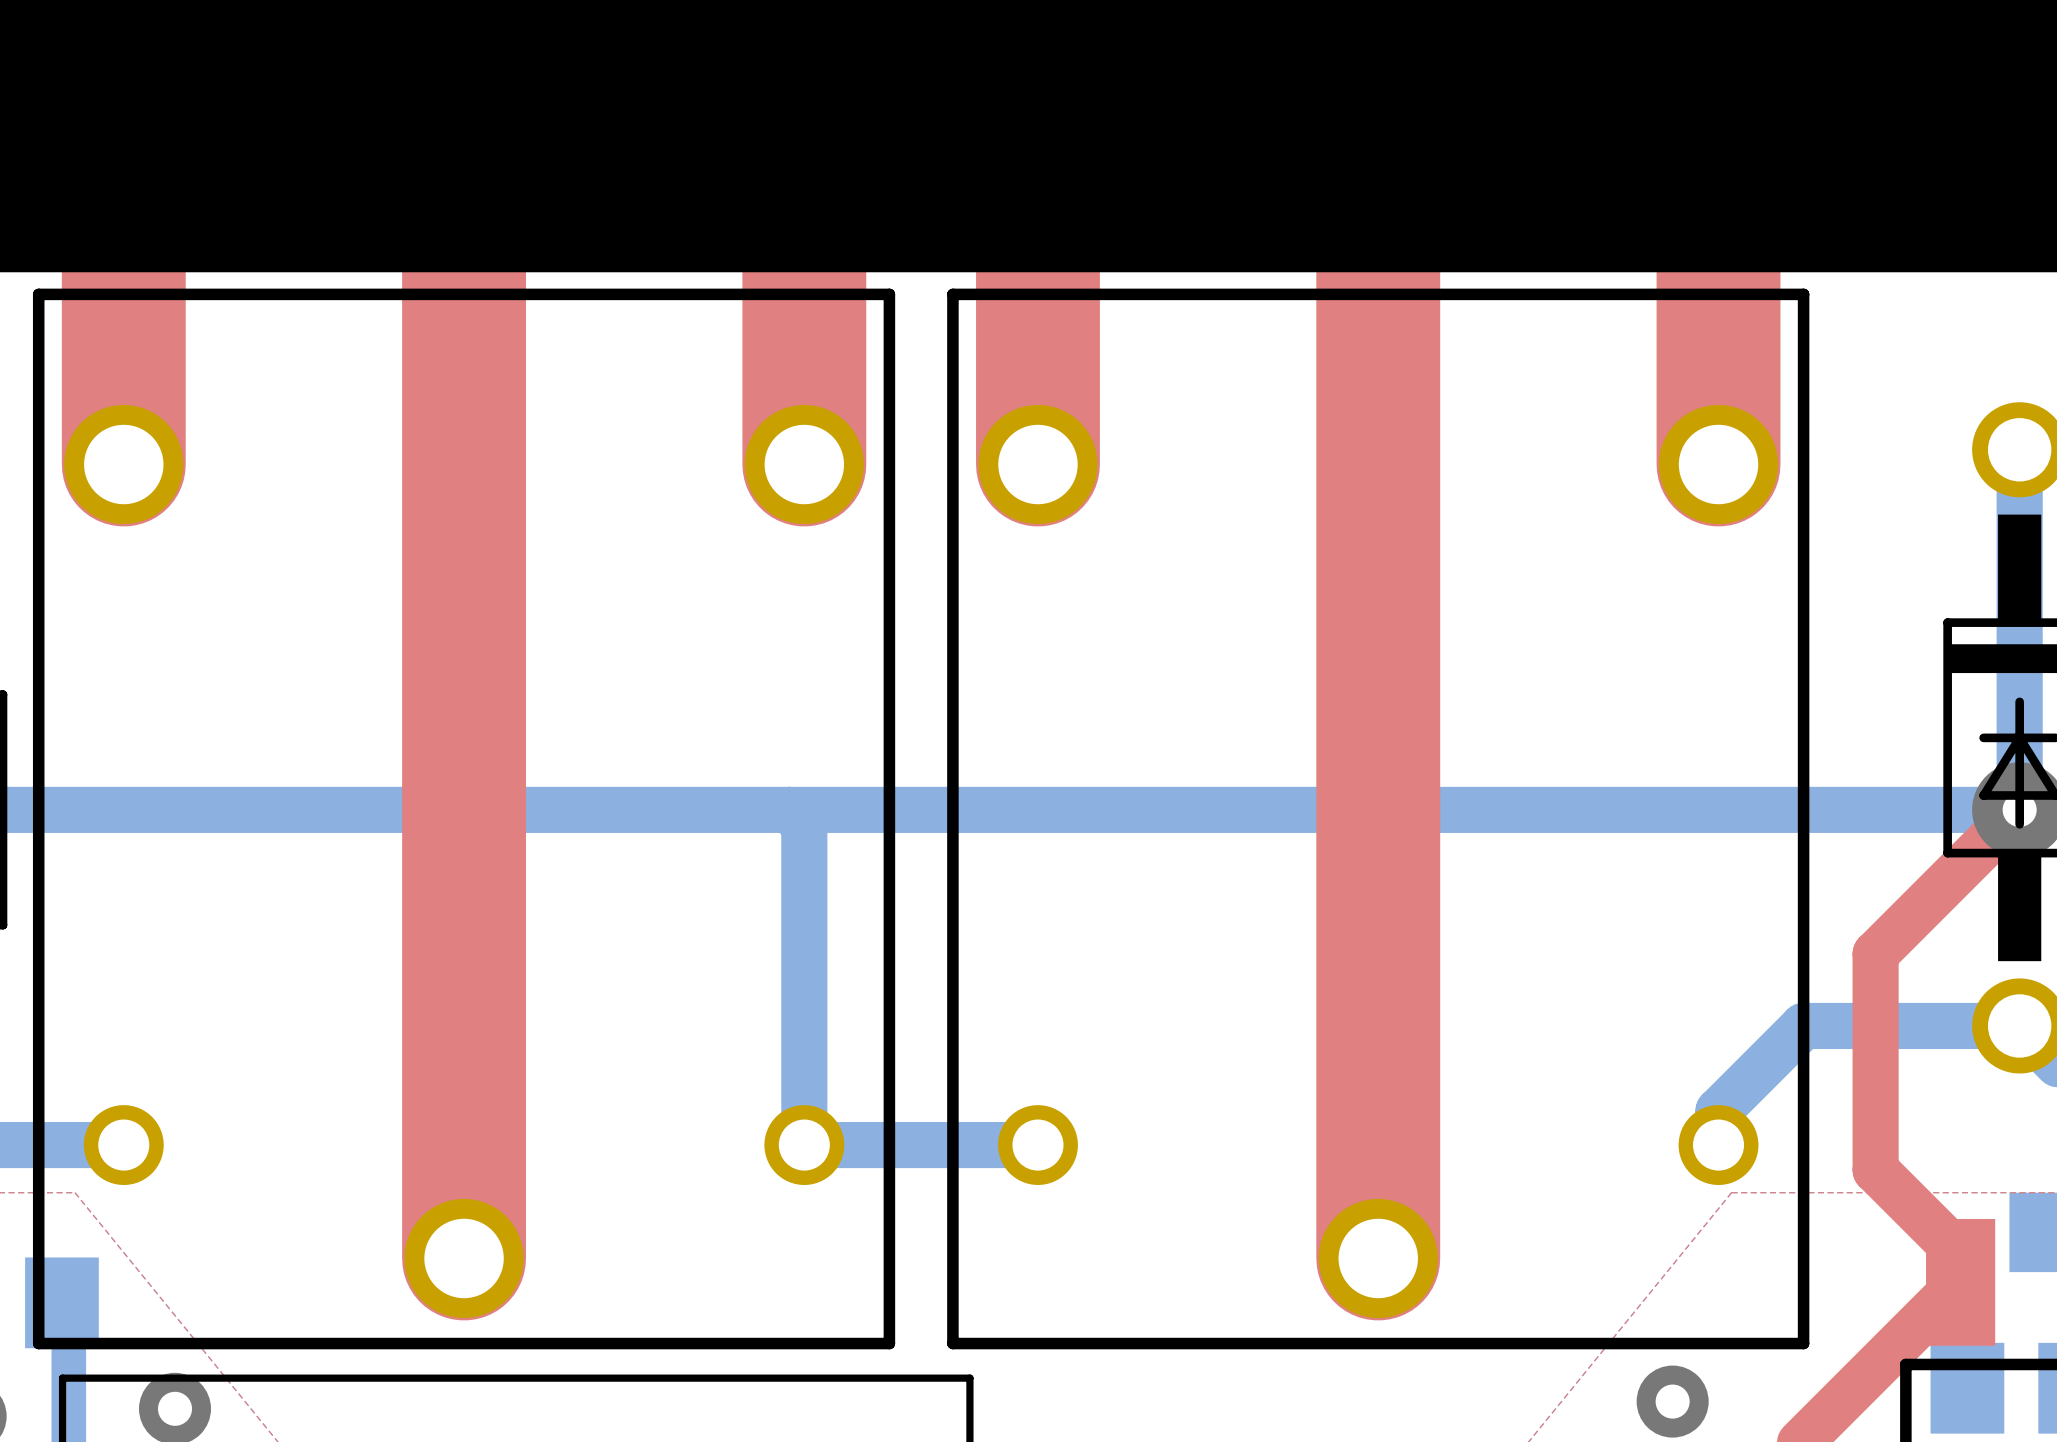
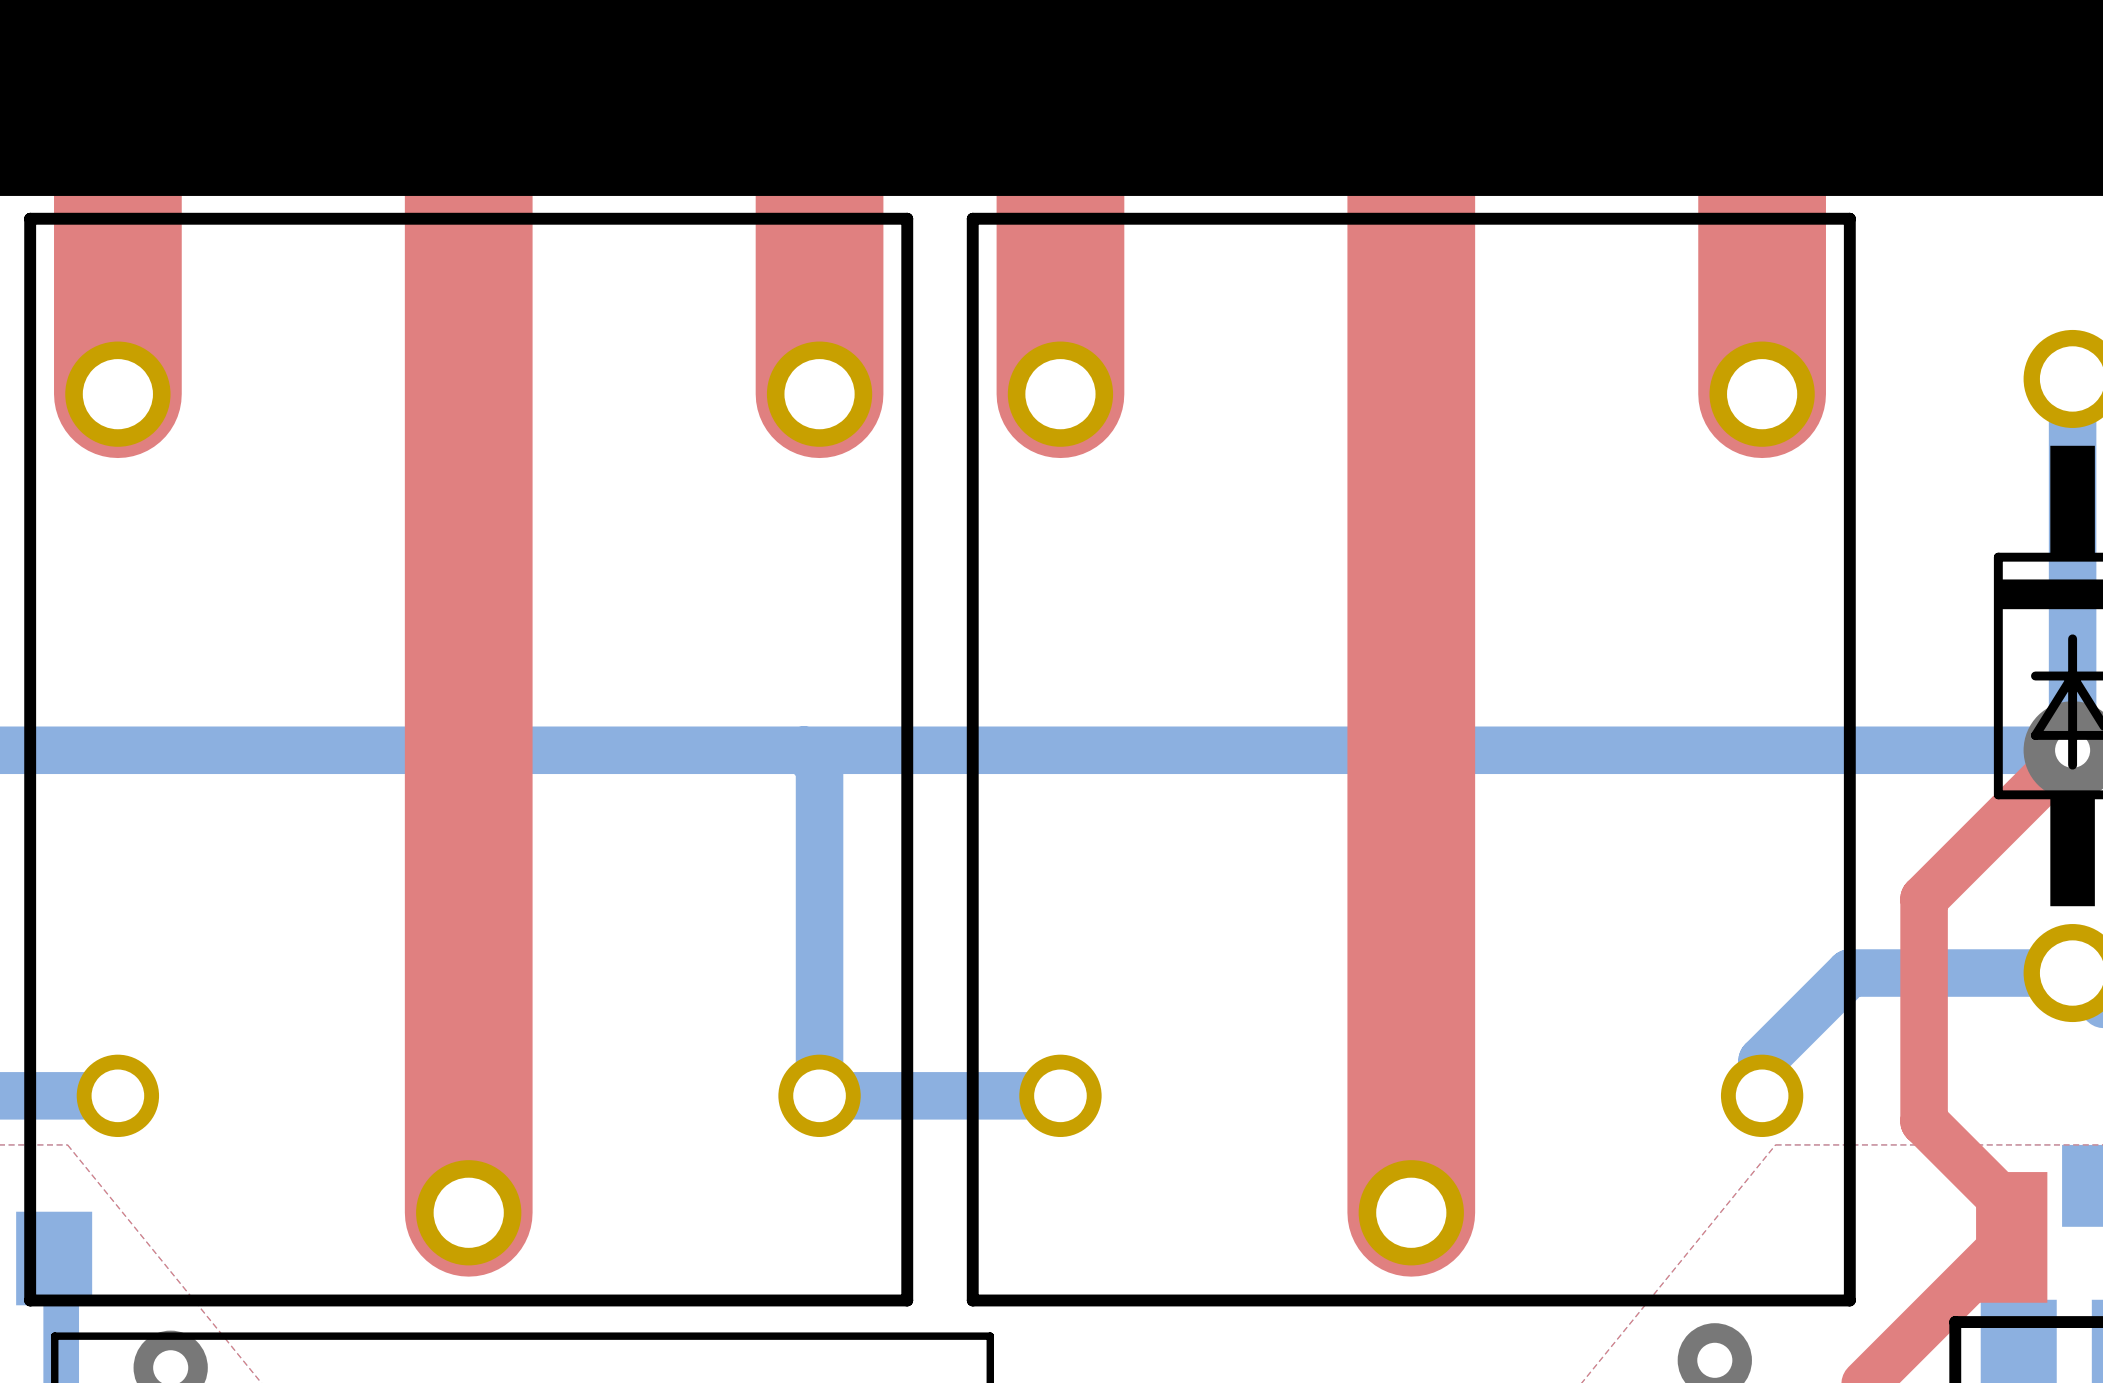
part footprint: [32, 288, 896, 1350] -> [24, 212, 914, 1307]
part footprint: [947, 288, 1810, 1350] -> [966, 212, 1856, 1307]

